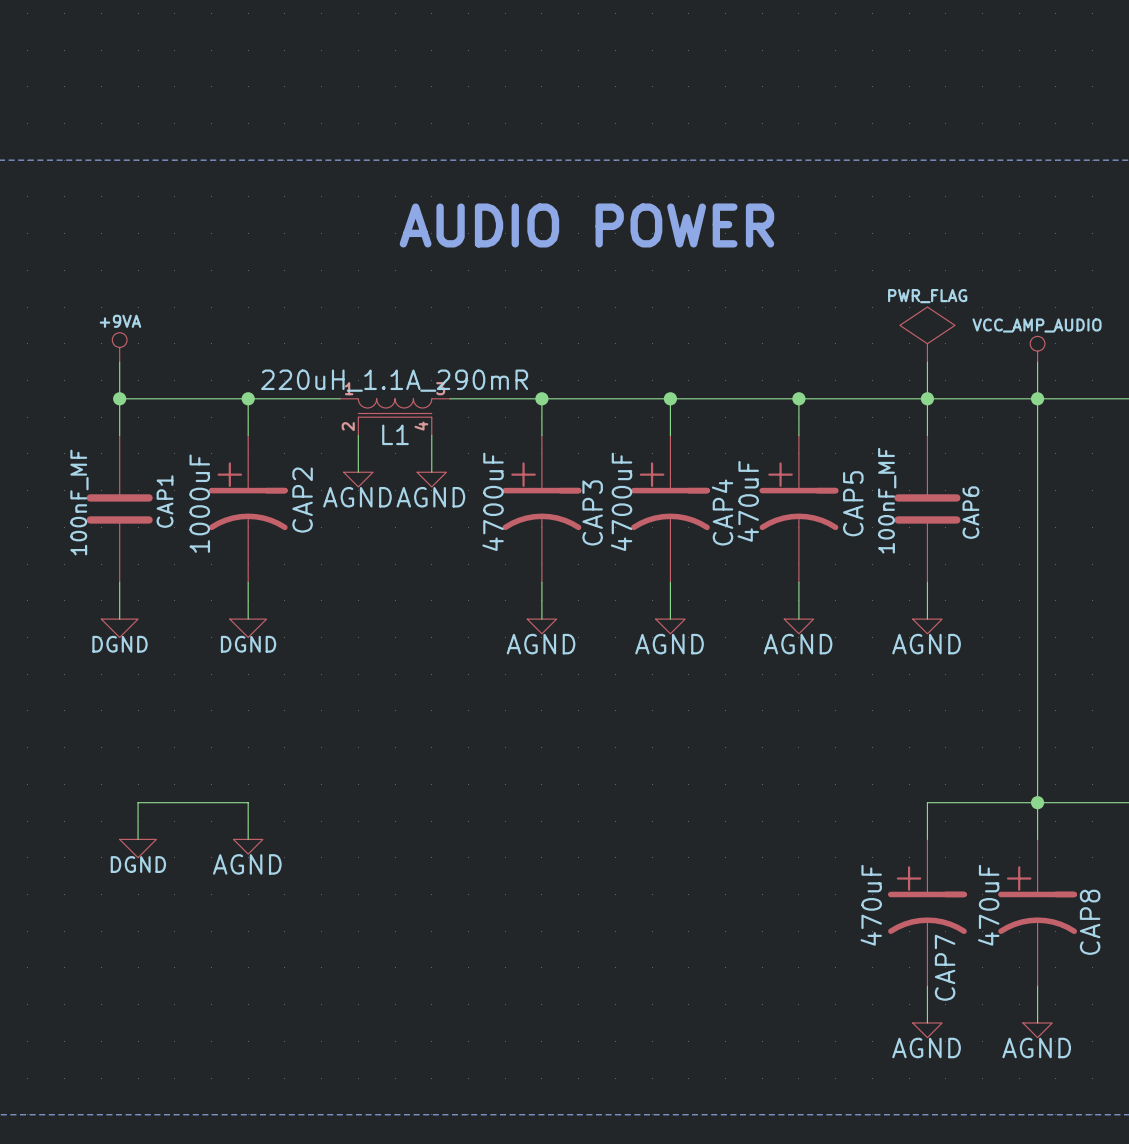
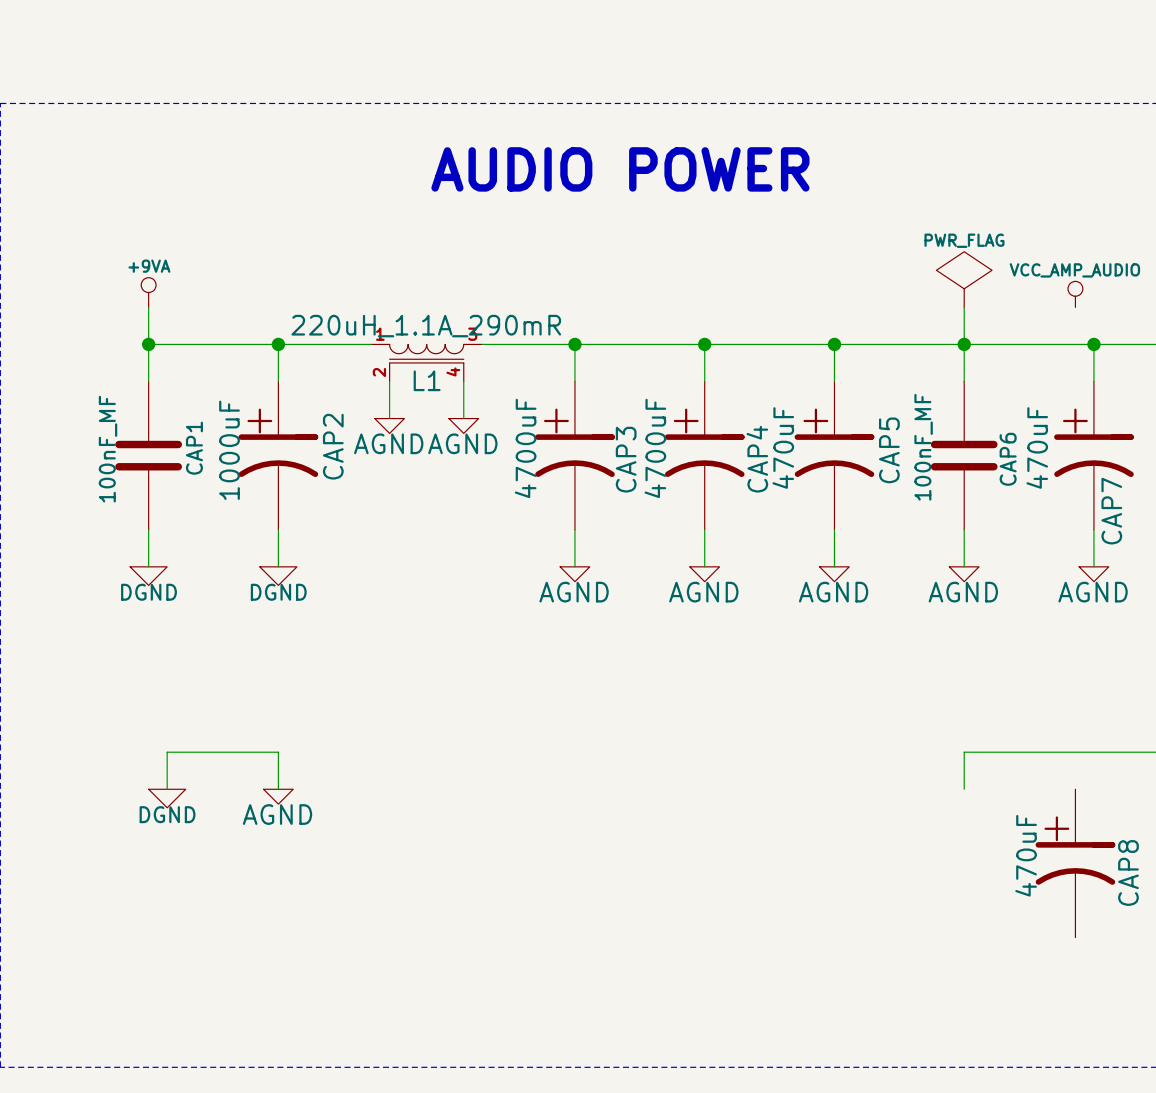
wire: (1037, 362) (1037, 839) -> none
junction position: (1037, 398) -> (1093, 344)
wire: none -> (1093, 344) (1093, 381)
wire: none -> (1093, 529) (1093, 566)
power symbol: none -> AGND (1093, 574)
junction: (1037, 802) -> none
CAP7 position: (927, 912) -> (1093, 455)
wire: (927, 986) (927, 1022) -> none
wire: (1037, 986) (1037, 1022) -> none
power symbol: AGND (927, 1030) -> none
power symbol: AGND (1037, 1030) -> none

